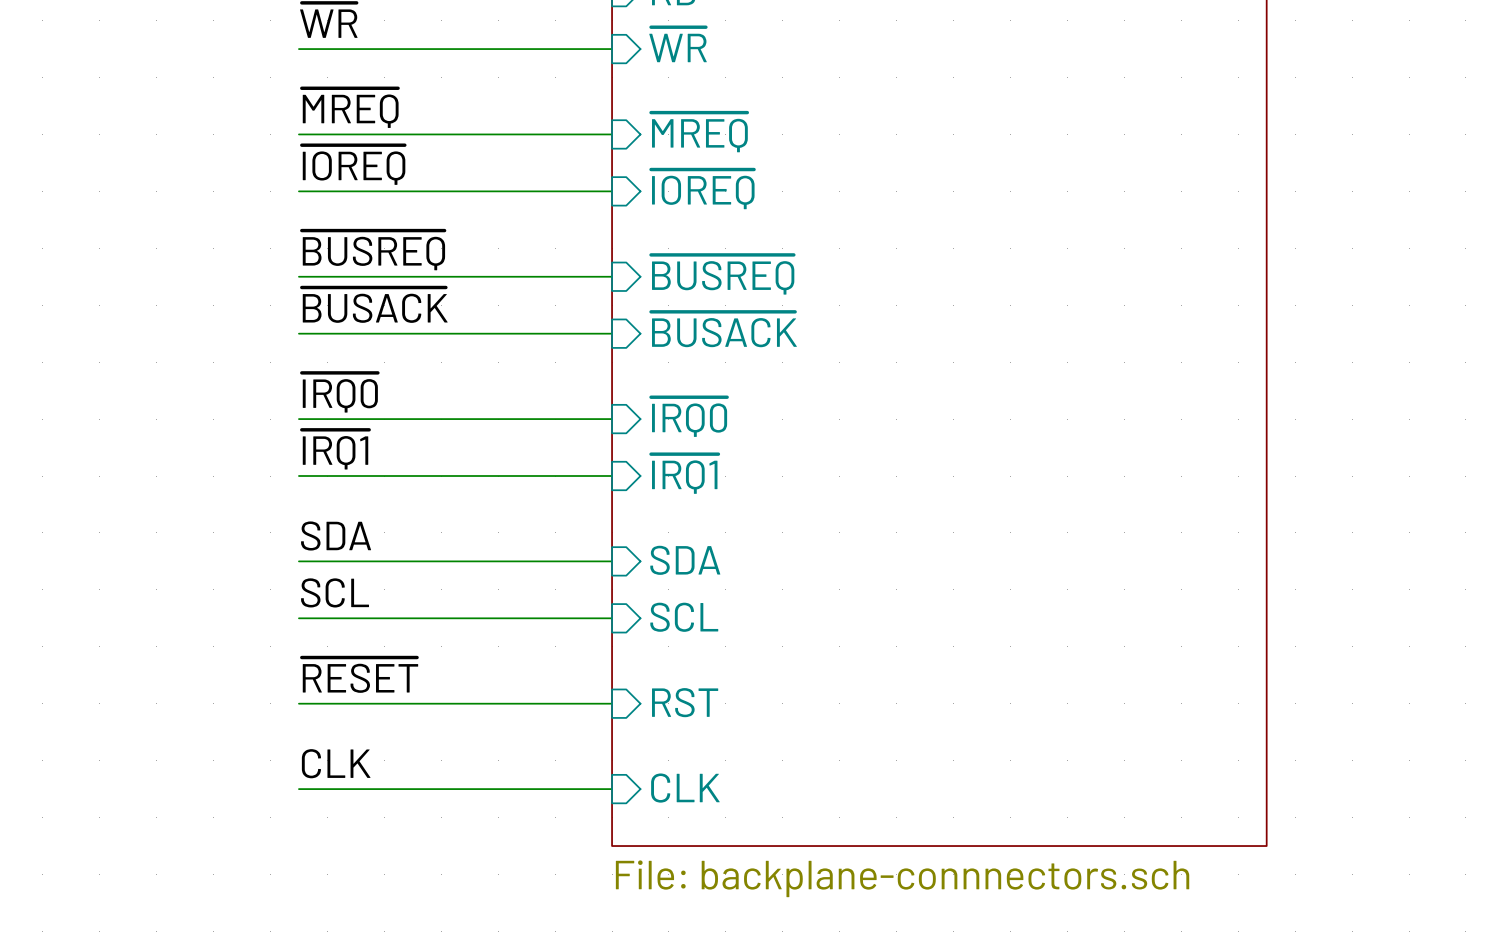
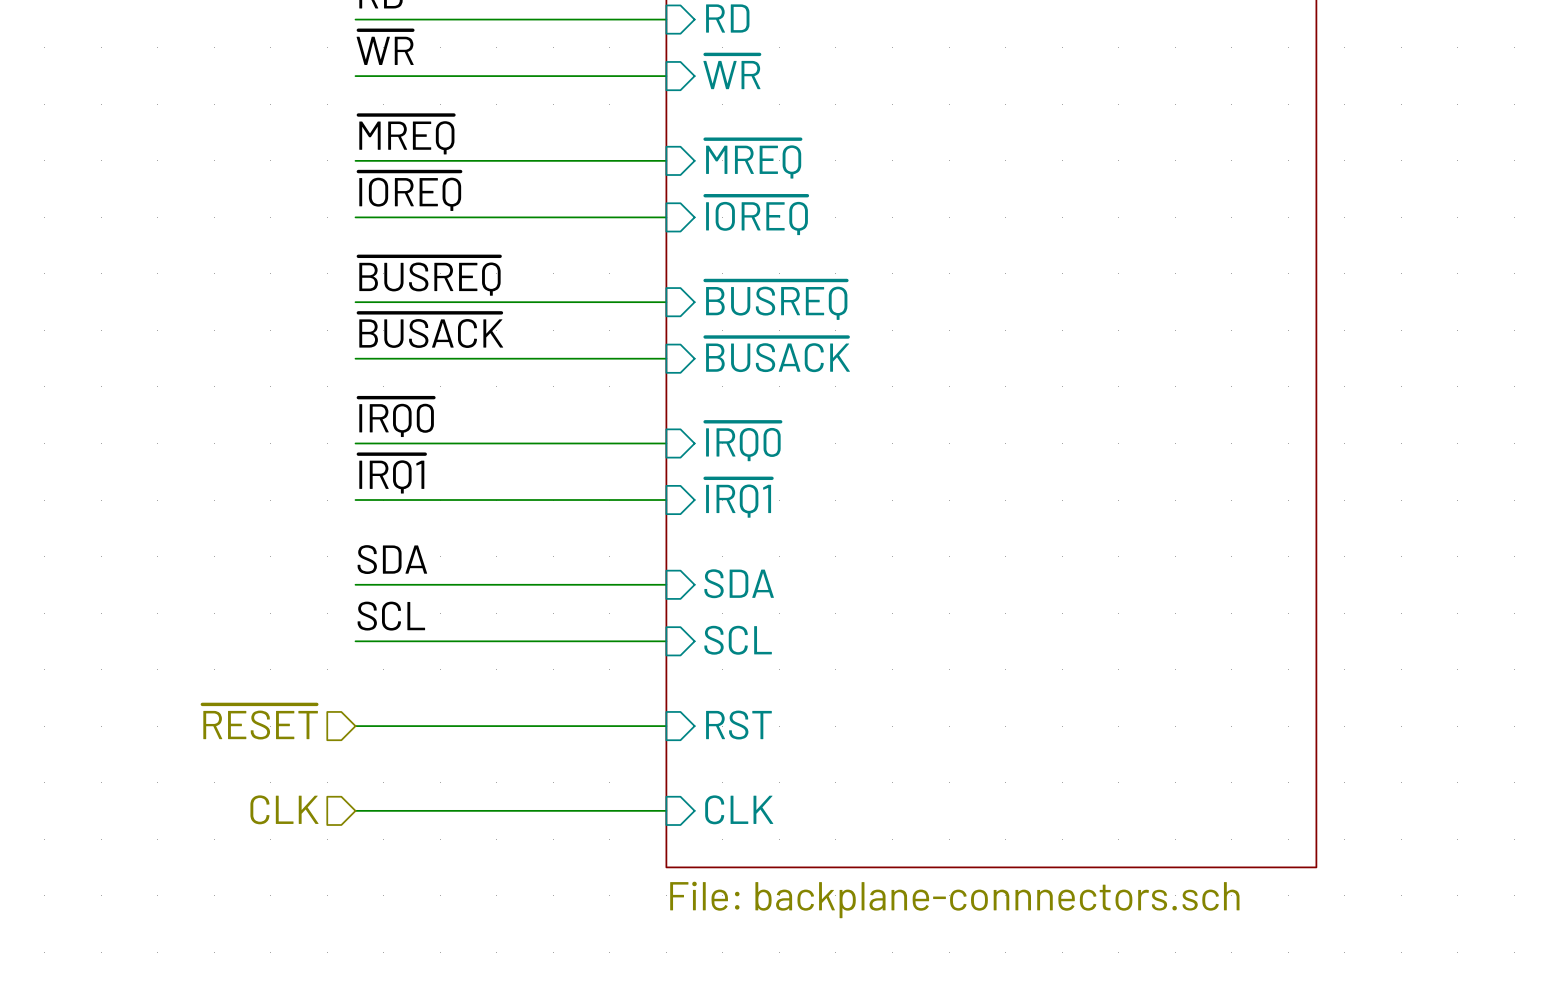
label: ~{RESET} (359, 675) -> none
hierarchical label: none -> ~{RESET} (260, 721)
label: CLK (336, 763) -> none
hierarchical label: none -> CLK (284, 809)

